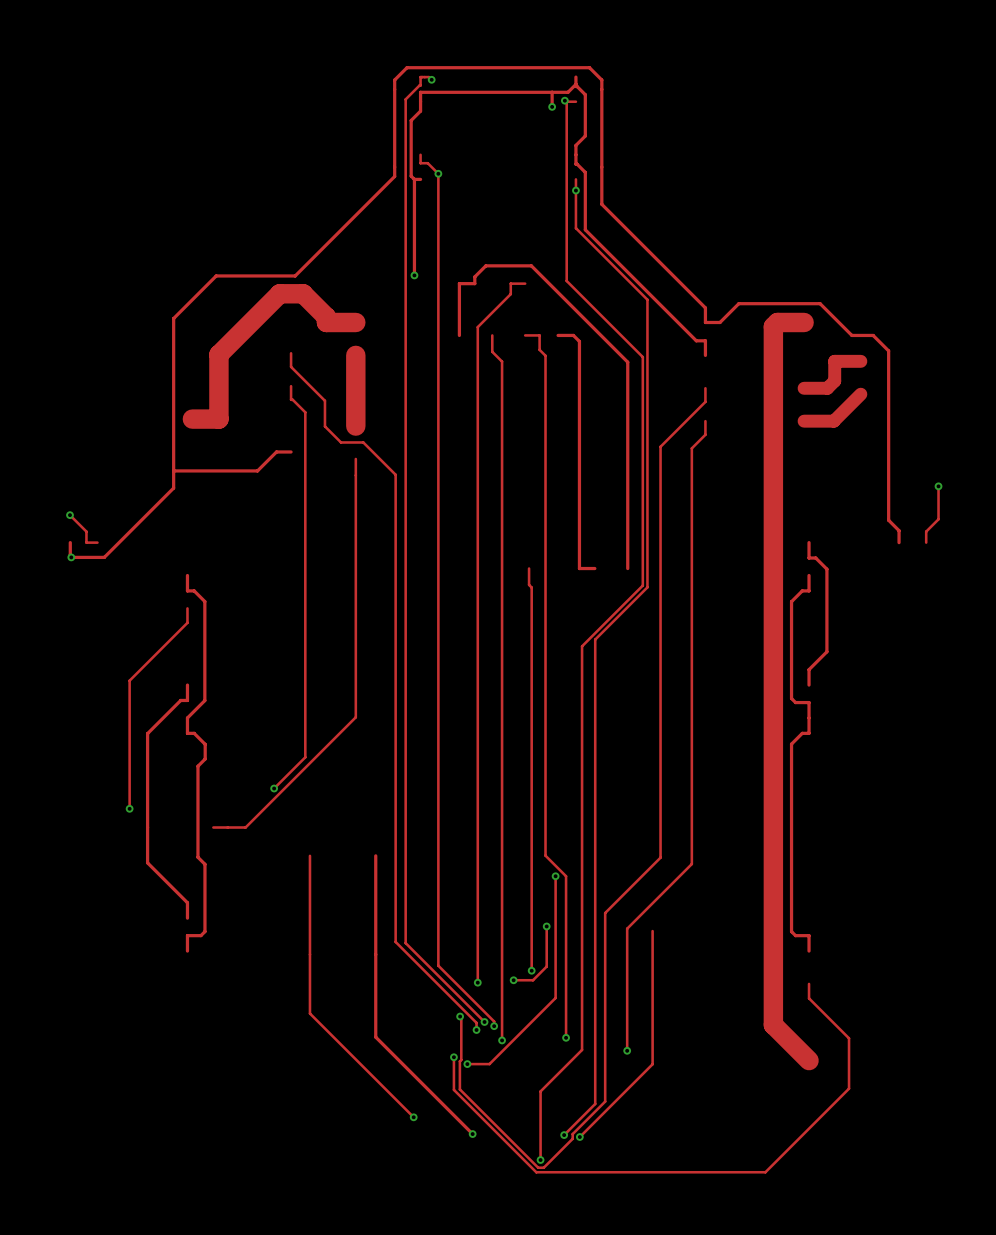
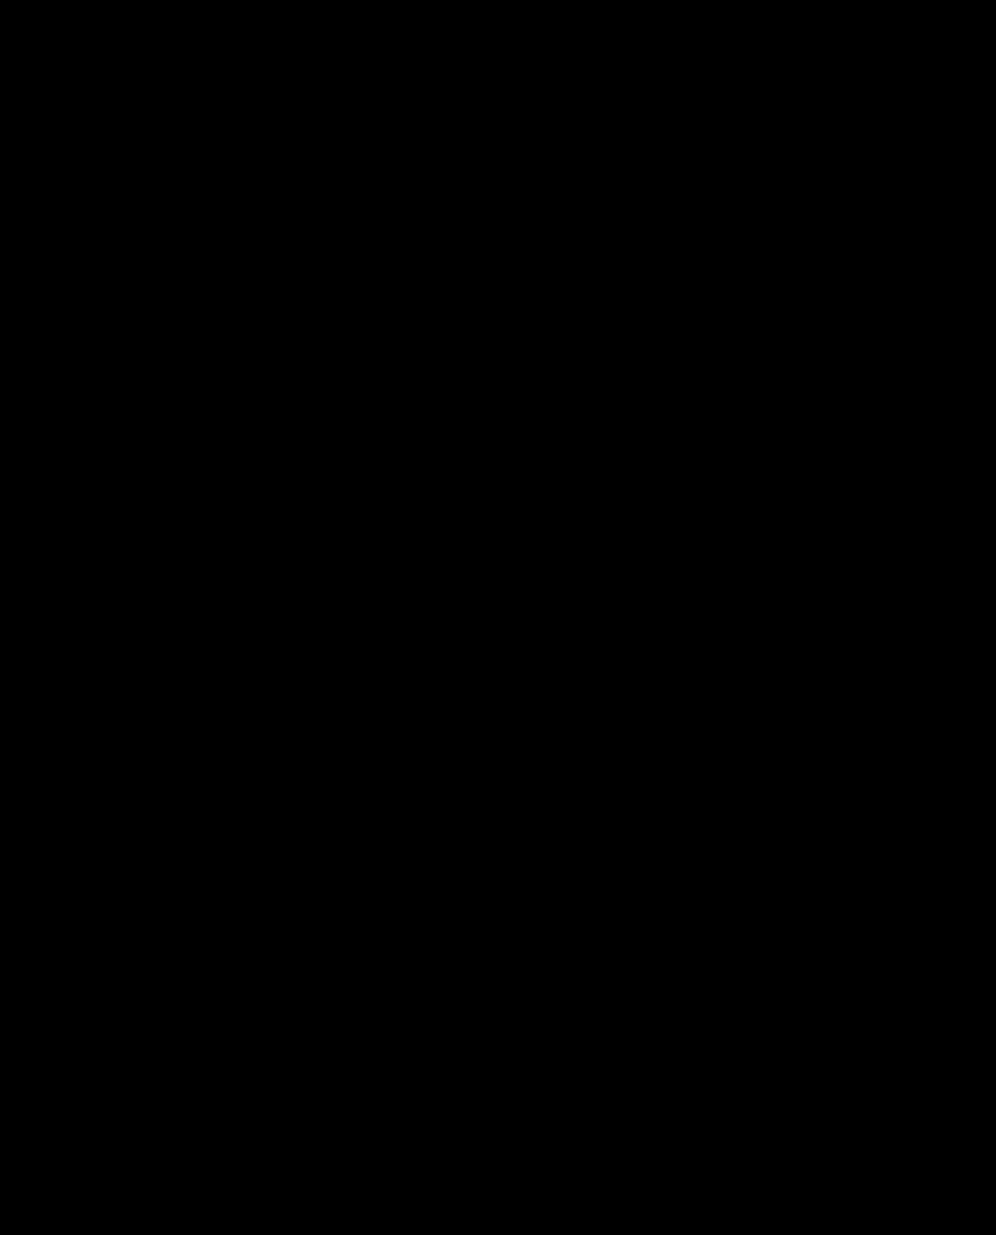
track: (575, 77) (575, 86) (585, 94) (585, 136) (575, 145) (575, 164) (585, 172) (585, 229) (696, 340) (705, 340) (705, 355) -> none
track: (431, 79) (428, 77) (420, 77) (420, 85) (405, 99) (405, 943) (484, 1021) -> none
via: (431, 79) -> none
track: (575, 84) (568, 92) (420, 92) (420, 111) (411, 120) (411, 176) (414, 179) -> none
track: (552, 92) (552, 106) -> none
track: (564, 100) (575, 101) -> none
via: (564, 100) -> none
track: (566, 101) (566, 280) (642, 357) (642, 585) (582, 646) (582, 1049) (540, 1091) (540, 1160) -> none
via: (552, 106) -> none
track: (420, 154) (420, 163) (427, 163) (438, 173) (438, 965) (494, 1021) (494, 1026) -> none
via: (438, 173) -> none
track: (414, 179) (420, 179) -> none
track: (414, 179) (414, 275) -> none
track: (575, 179) (575, 228) (647, 299) (647, 587) (595, 639) (595, 1103) (564, 1135) -> none
via: (575, 190) -> none
via: (414, 275) -> none
track: (525, 283) (510, 283) (510, 294) (477, 327) (477, 982) -> none
track: (355, 322) (326, 322) (326, 317) (303, 293) (279, 293) (218, 354) (218, 419) (192, 419) -> none
track: (804, 322) (777, 322) (773, 326) (773, 1024) (809, 1060) -> none
track: (459, 335) (459, 283) (474, 283) (474, 276) (485, 265) (531, 265) (627, 362) (627, 568) -> none
track: (492, 335) (492, 351) (502, 361) (502, 1040) -> none
track: (525, 335) (539, 335) (539, 349) (545, 355) (545, 855) (566, 876) (566, 1037) -> none
track: (558, 335) (573, 335) (579, 341) (579, 568) (594, 568) -> none
track: (291, 353) (291, 366) (324, 400) (324, 426) (341, 442) (363, 442) (395, 474) (395, 941) (476, 1022) (476, 1030) -> none
track: (355, 355) (355, 426) -> none
track: (860, 361) (834, 361) (834, 380) (827, 388) (804, 388) -> none
track: (291, 386) (291, 399) (305, 412) (305, 757) (274, 788) -> none
track: (705, 388) (705, 401) (660, 446) (660, 857) (605, 913) (605, 1101) (572, 1134) (572, 1138) (543, 1167) (538, 1167) (459, 1089) (460, 1016) -> none
track: (860, 394) (833, 421) (804, 421) -> none
track: (705, 421) (705, 434) (691, 448) (691, 864) (627, 928) (627, 1050) -> none
track: (291, 451) (276, 451) (257, 470) (173, 470) -> none
track: (355, 458) (355, 717) (245, 827) (213, 827) -> none
track: (938, 486) (938, 519) (926, 531) (926, 542) -> none
via: (938, 486) -> none
track: (69, 515) (86, 531) (86, 542) (97, 542) -> none
via: (69, 515) -> none
track: (70, 542) (71, 557) (104, 557) (173, 488) (173, 318) (216, 275) (295, 275) (394, 176) (394, 80) (406, 67) (589, 67) (601, 80) (601, 204) (705, 307) (705, 322) (720, 322) (738, 303) (820, 303) (851, 335) (873, 335) (888, 350) (888, 520) (899, 530) (899, 542) -> none
track: (809, 542) (809, 558) (815, 558) (826, 569) (826, 651) (809, 669) (809, 685) -> none
via: (71, 557) -> none
track: (529, 568) (529, 584) (531, 587) (531, 970) -> none
track: (187, 575) (187, 590) (194, 590) (204, 601) (204, 700) (187, 717) (187, 733) (194, 733) (205, 744) (205, 759) (197, 766) (197, 857) (204, 864) (204, 931) (200, 935) (187, 935) (187, 951) -> none
track: (809, 575) (809, 590) (802, 590) (791, 601) (791, 698) (795, 702) (809, 702) (809, 733) (802, 733) (791, 744) (791, 931) (795, 935) (809, 935) (809, 951) -> none
track: (187, 608) (187, 622) (129, 680) (129, 808) -> none
track: (187, 685) (187, 700) (180, 700) (147, 733) (147, 862) (187, 902) (187, 918) -> none
via: (274, 788) -> none
via: (129, 808) -> none
track: (309, 855) (309, 1013) (413, 1117) -> none
track: (375, 855) (375, 1037) (472, 1134) -> none
track: (555, 876) (555, 998) (489, 1064) (467, 1064) -> none
via: (555, 876) -> none
track: (546, 926) (546, 966) (533, 980) (513, 980) -> none
via: (546, 926) -> none
track: (652, 931) (652, 1064) (579, 1137) -> none
via: (531, 970) -> none
via: (513, 980) -> none
via: (477, 982) -> none
track: (809, 983) (809, 998) (849, 1038) (849, 1088) (765, 1172) (536, 1172) (453, 1089) (453, 1057) -> none
via: (460, 1016) -> none
via: (484, 1021) -> none
via: (494, 1026) -> none
via: (476, 1030) -> none
via: (566, 1037) -> none
via: (502, 1040) -> none
via: (627, 1050) -> none
via: (453, 1057) -> none
via: (467, 1064) -> none
via: (413, 1117) -> none
via: (472, 1134) -> none
via: (564, 1135) -> none
via: (579, 1137) -> none
via: (540, 1160) -> none

